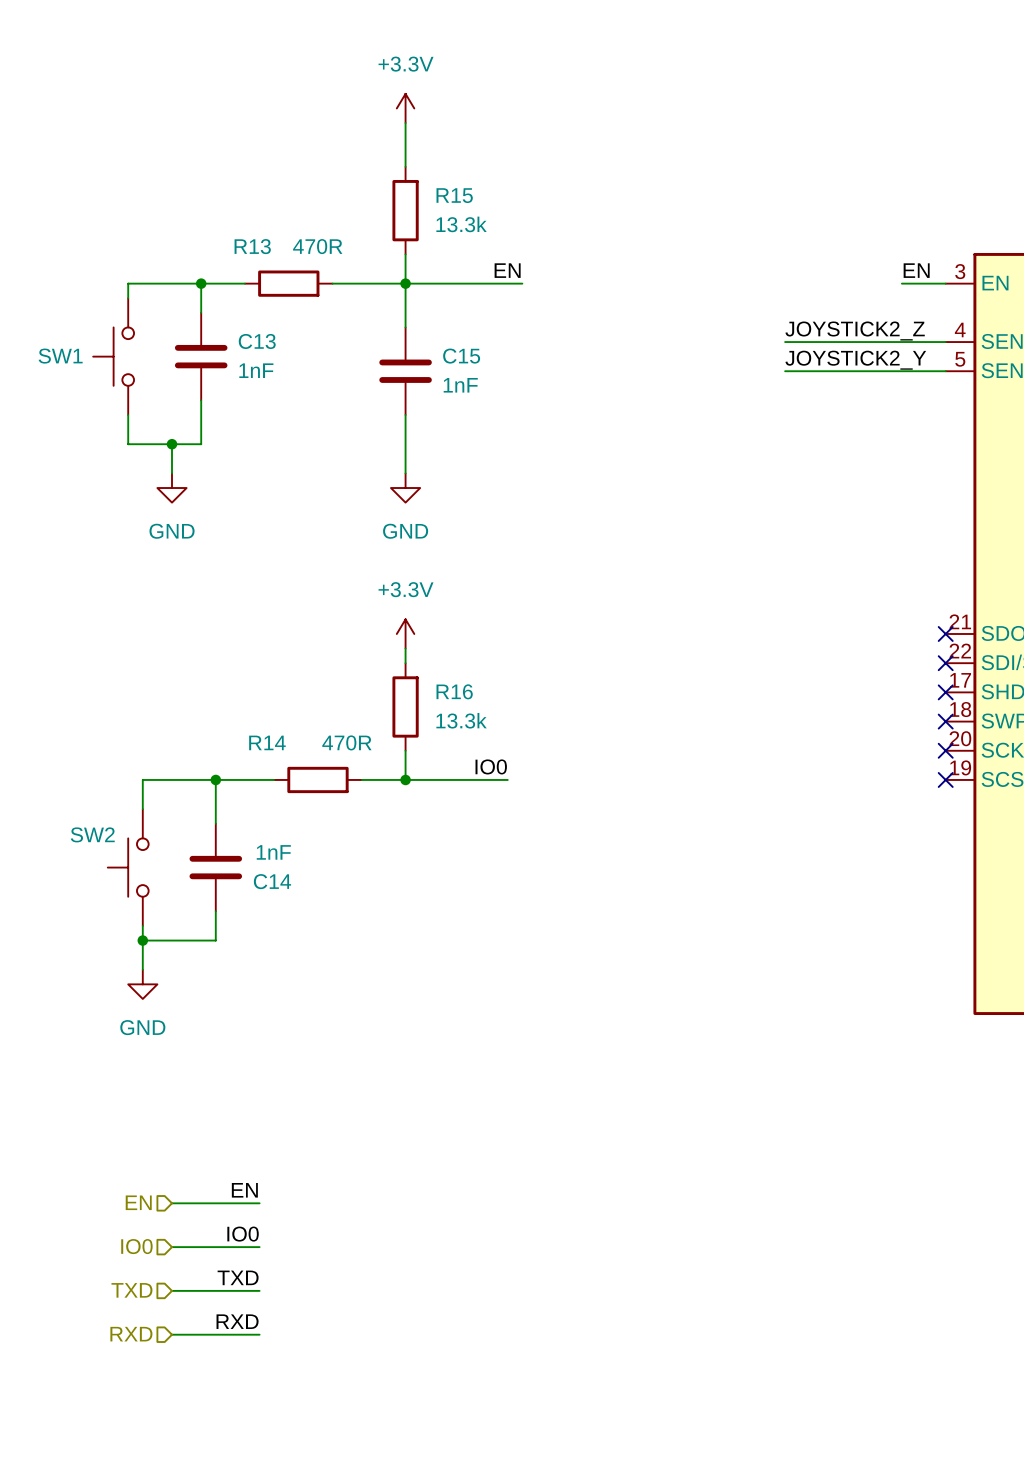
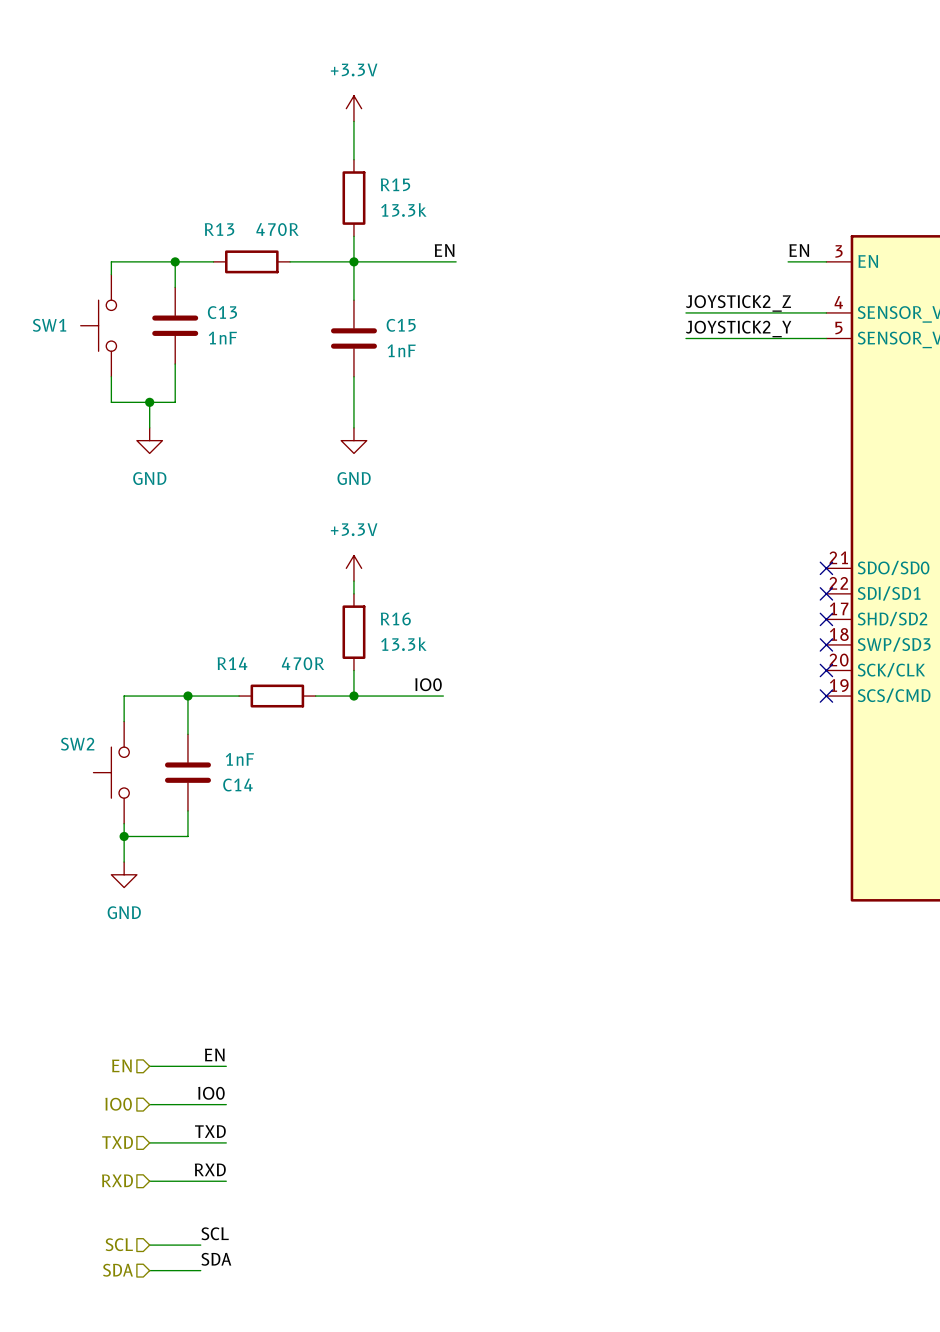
label: none -> SCL (215, 1233)
hierarchical label: none -> SCL (119, 1244)
wire: none -> (149, 1245) (200, 1245)
label: none -> SDA (216, 1259)
hierarchical label: none -> SDA (117, 1270)
wire: none -> (149, 1270) (200, 1270)

